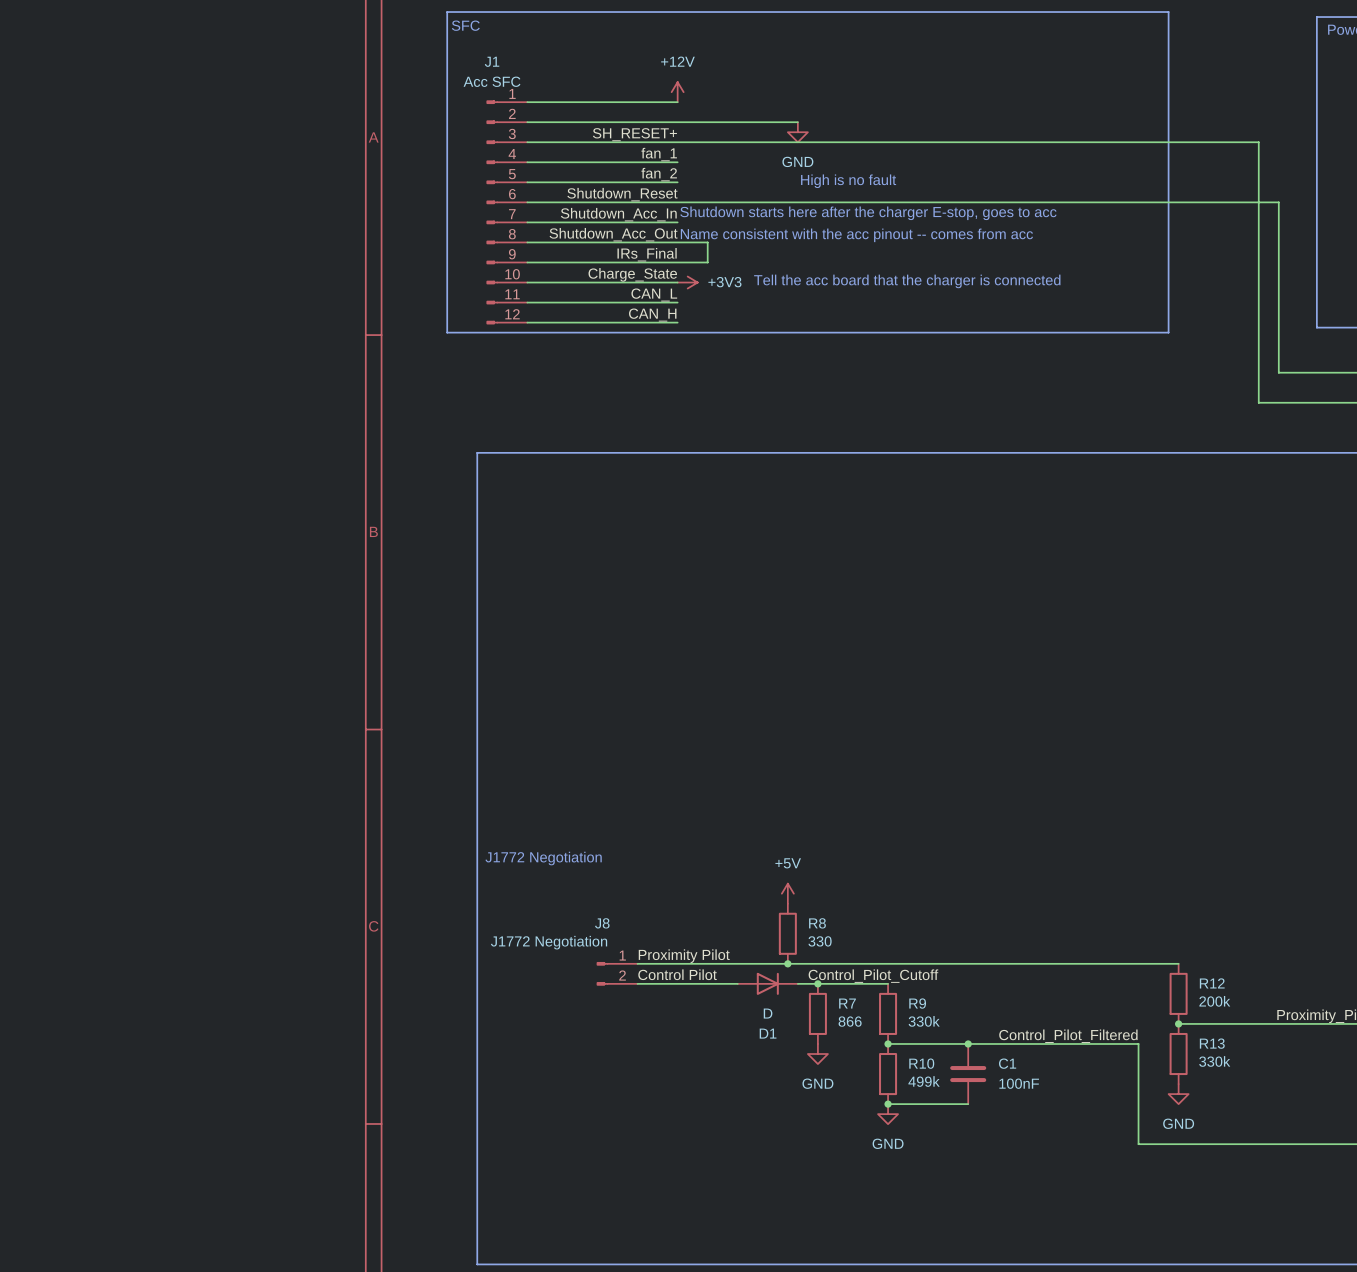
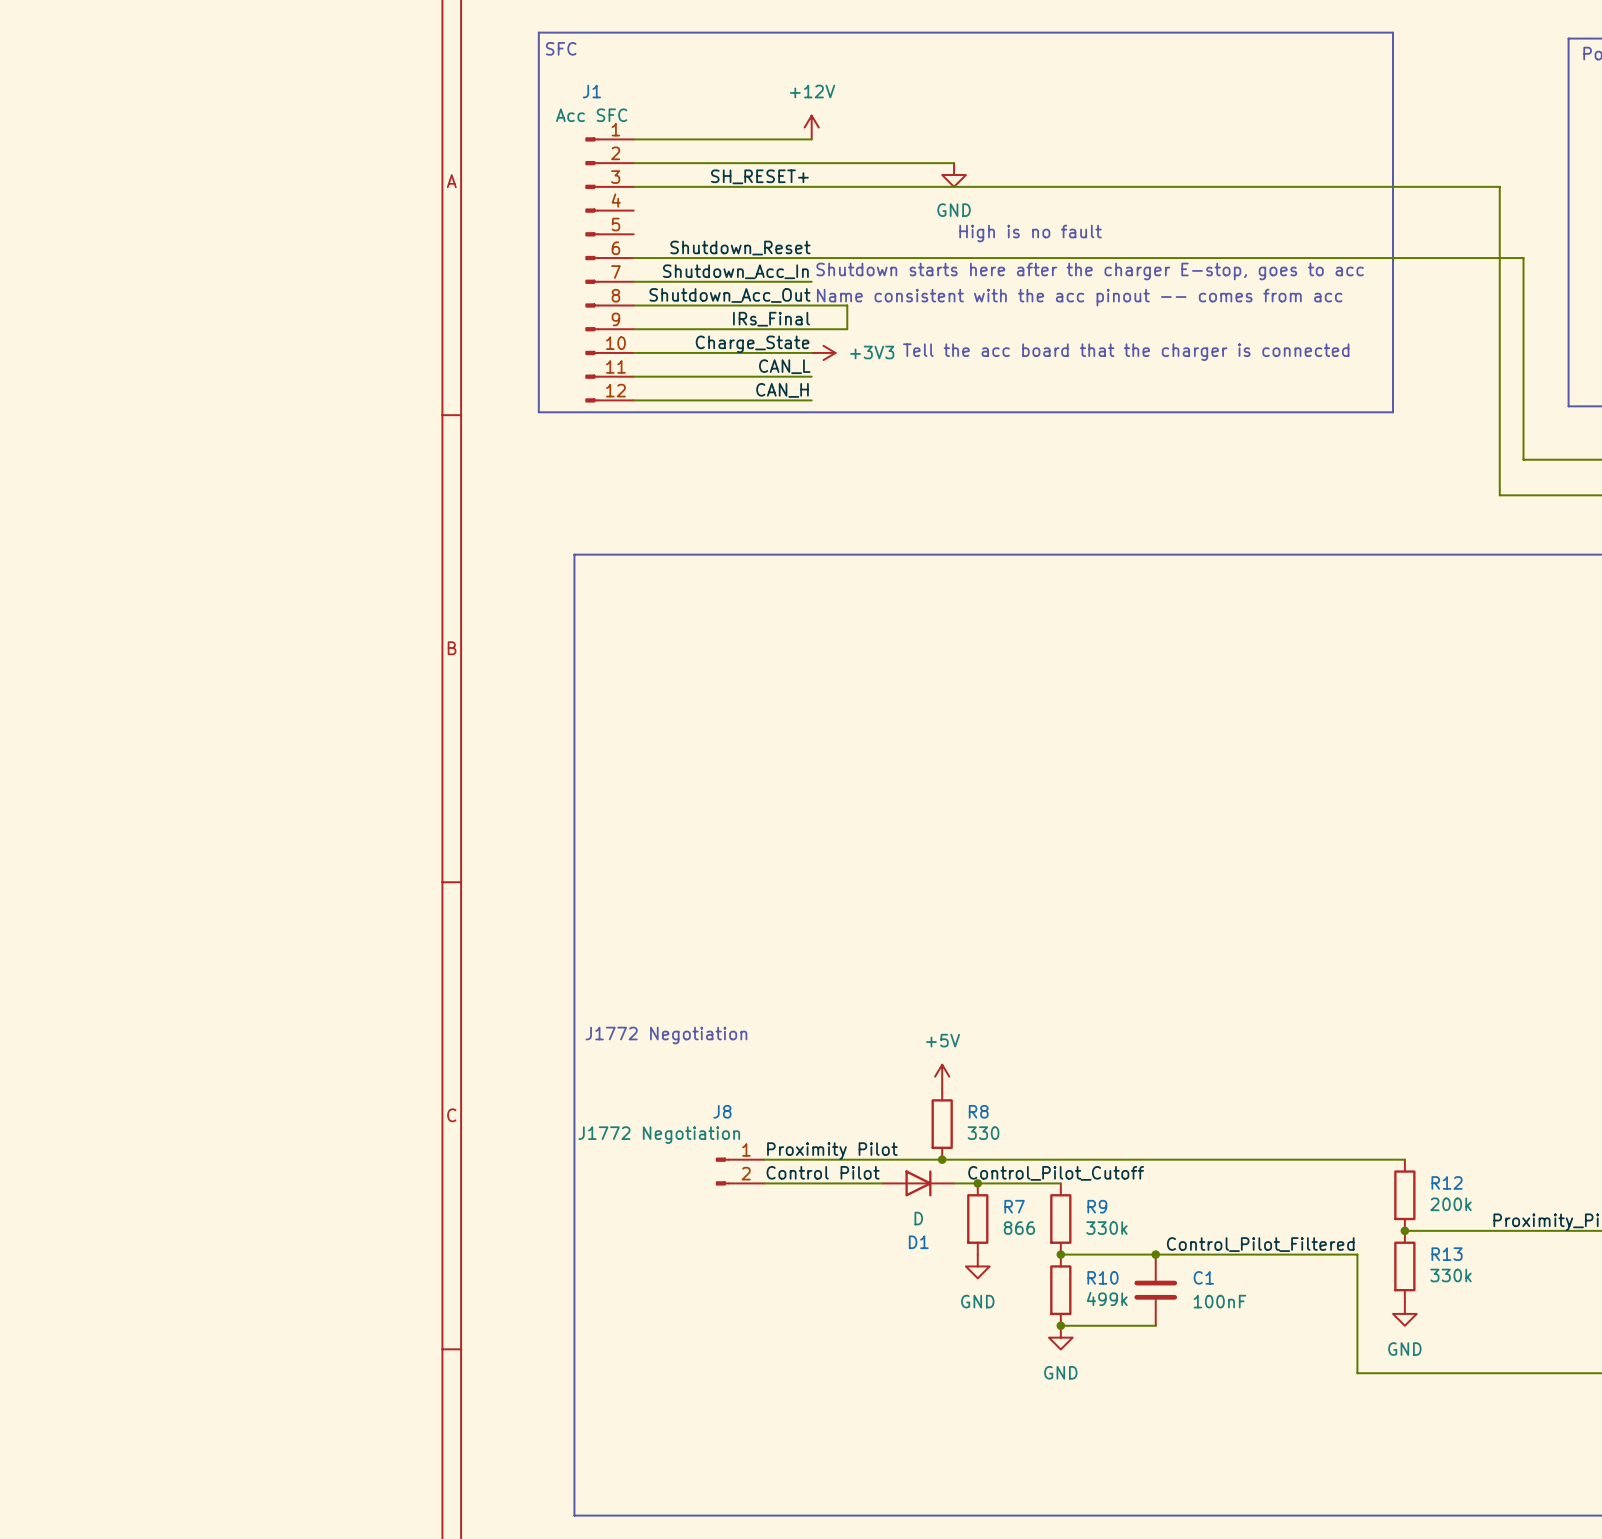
label: fan_1 (659, 154) -> none
wire: (527, 162) (677, 162) -> none
label: fan_2 (659, 174) -> none
wire: (527, 182) (677, 182) -> none

